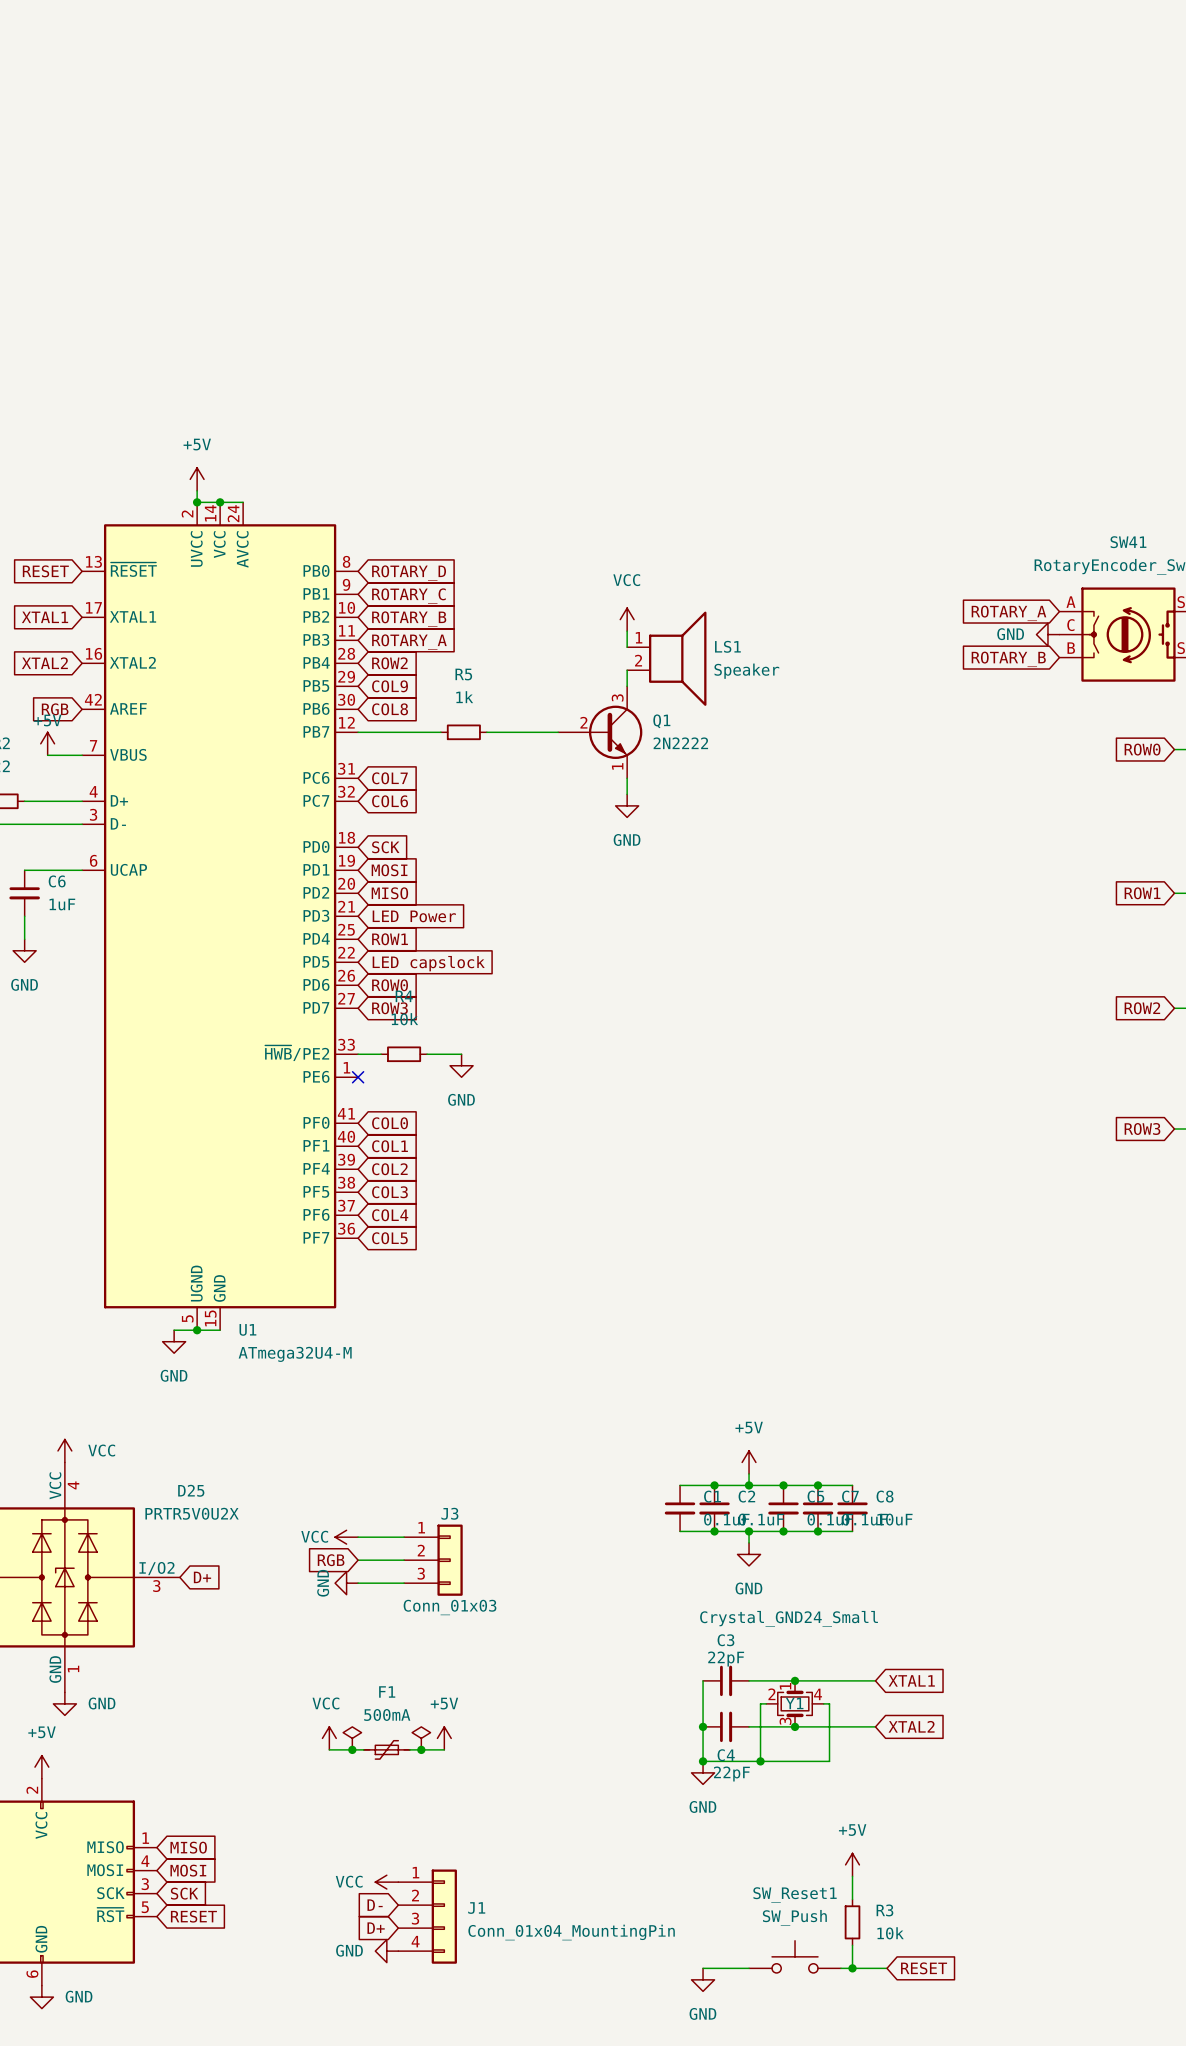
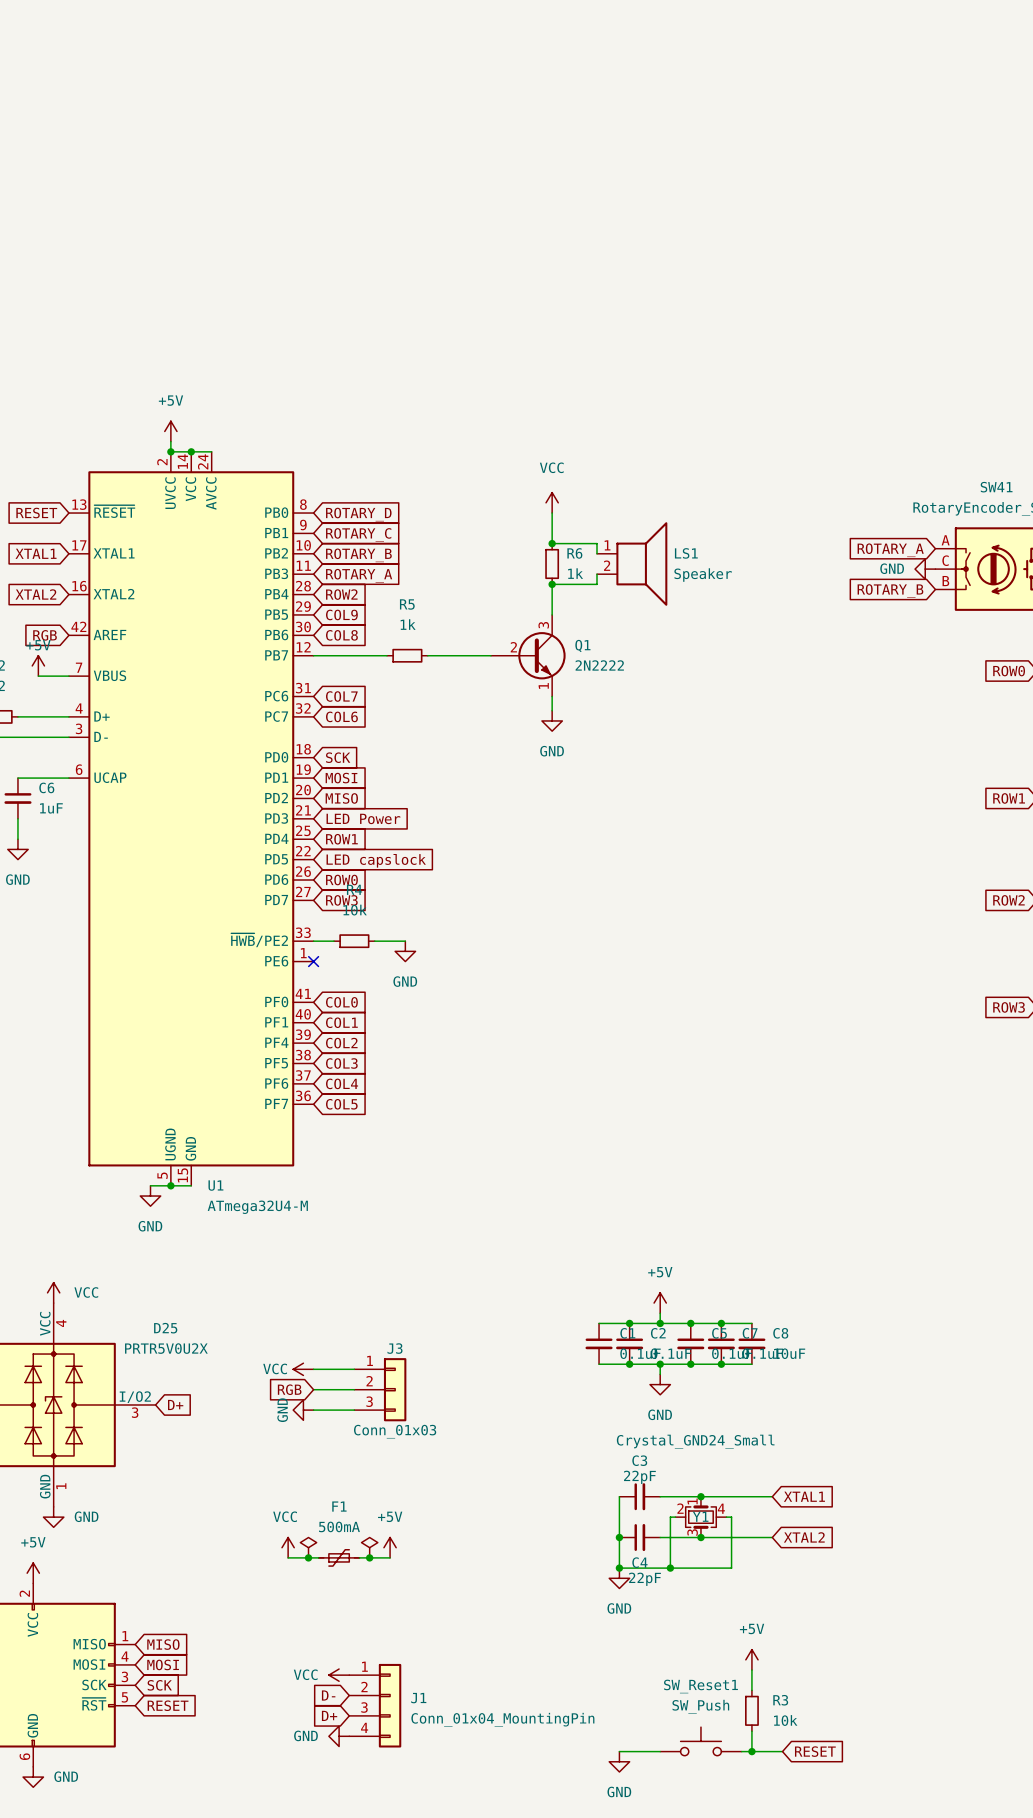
wire: none -> (552, 513) (552, 543) (596, 543) (596, 553)
junction: none -> (552, 543)
power symbol position: VCC (627, 619) -> VCC (552, 502)
R6: none -> 1k (552, 563)
wire: (627, 631) (627, 647) -> none
wire: none -> (596, 574) (596, 584) (552, 584) (552, 600)
junction: none -> (552, 584)
LS1 position: (666, 658) -> (632, 563)

